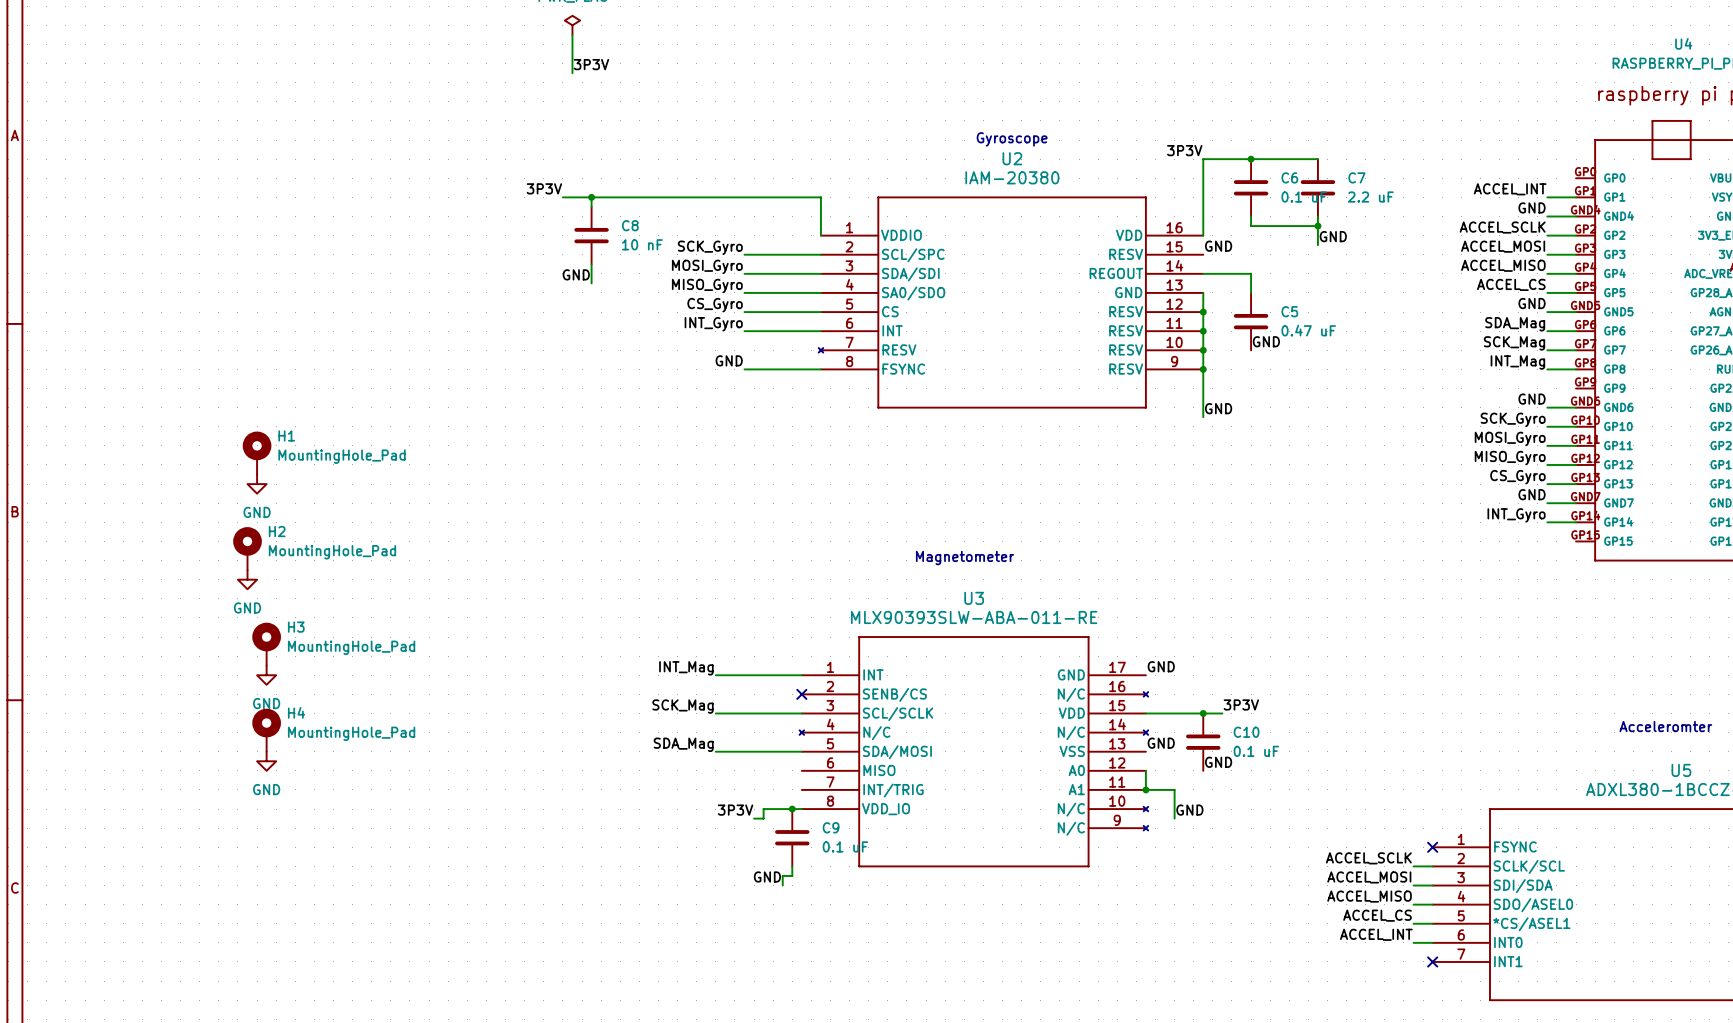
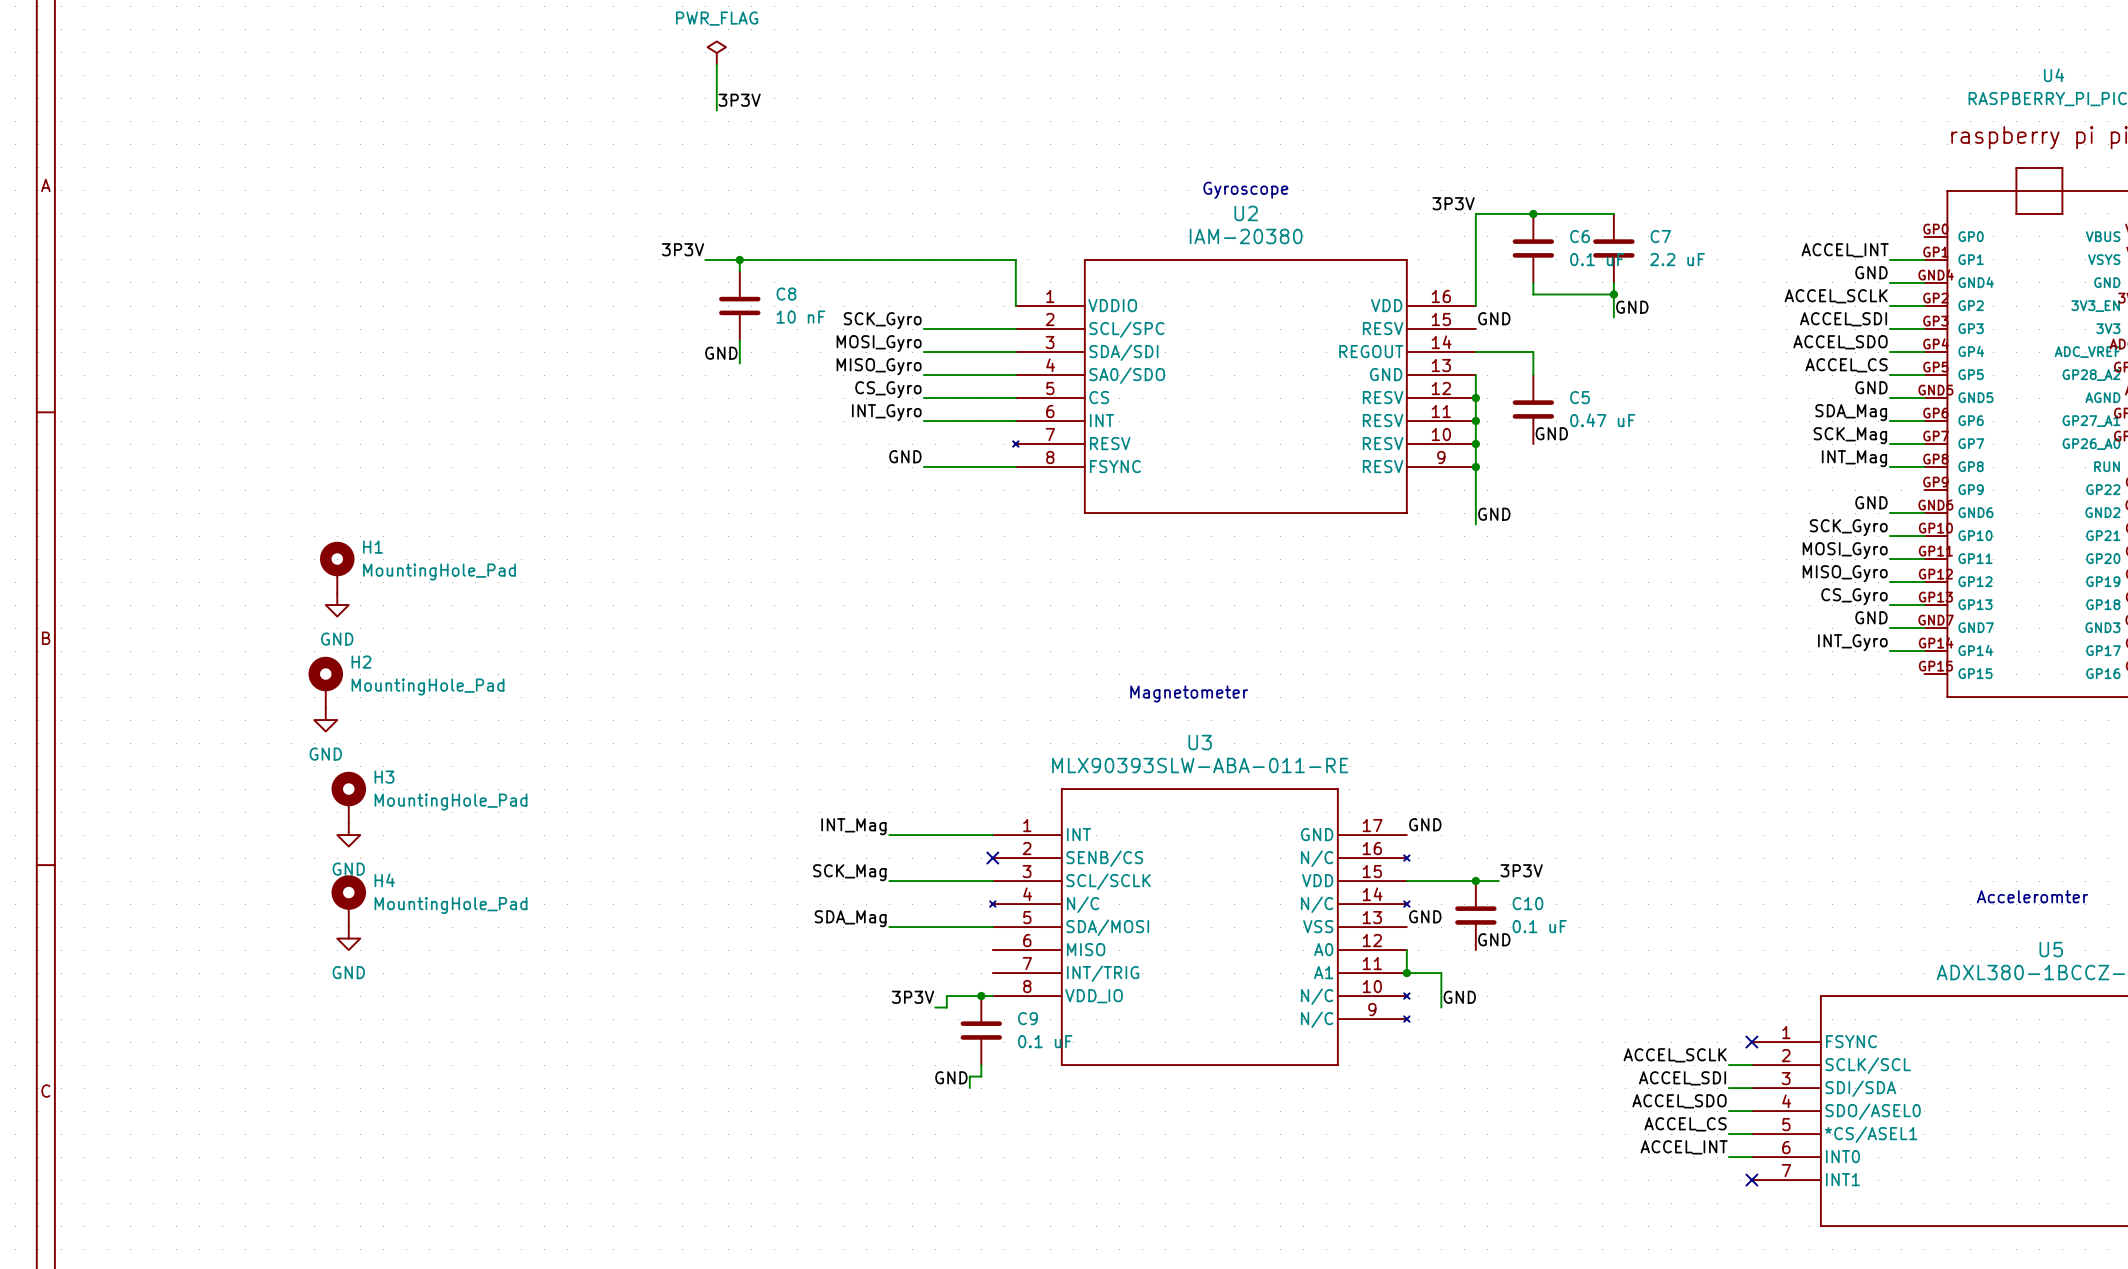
label: ACCEL_MOSI (1503, 246) -> ACCEL_SDI (1843, 319)
label: ACCEL_MISO (1503, 265) -> ACCEL_SDO (1840, 342)
label: ACCEL_MOSI (1369, 877) -> ACCEL_SDI (1682, 1078)
label: ACCEL_MISO (1369, 896) -> ACCEL_SDO (1679, 1101)

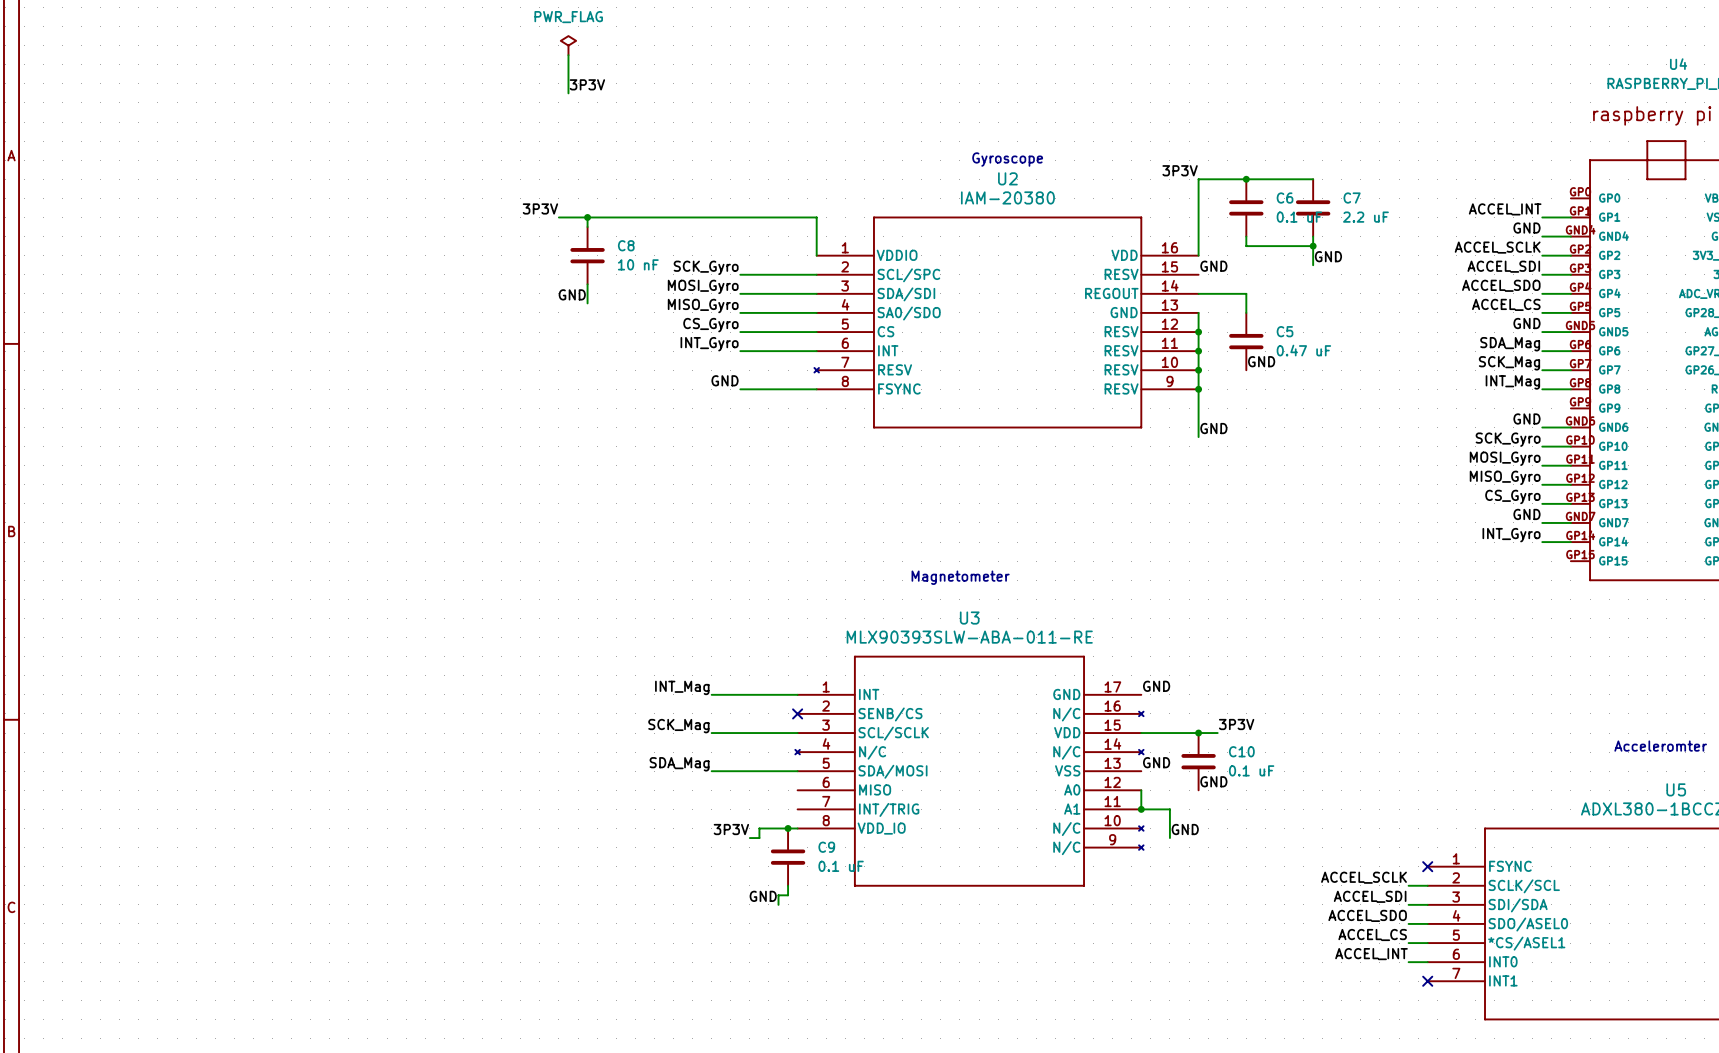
H1: MountingHole_Pad (337, 567) -> none
power symbol: GND (337, 605) -> none
H2: MountingHole_Pad (325, 682) -> none
power symbol: GND (325, 720) -> none
H3: MountingHole_Pad (348, 797) -> none
power symbol: GND (348, 835) -> none
H4: MountingHole_Pad (348, 901) -> none
power symbol: GND (348, 938) -> none

